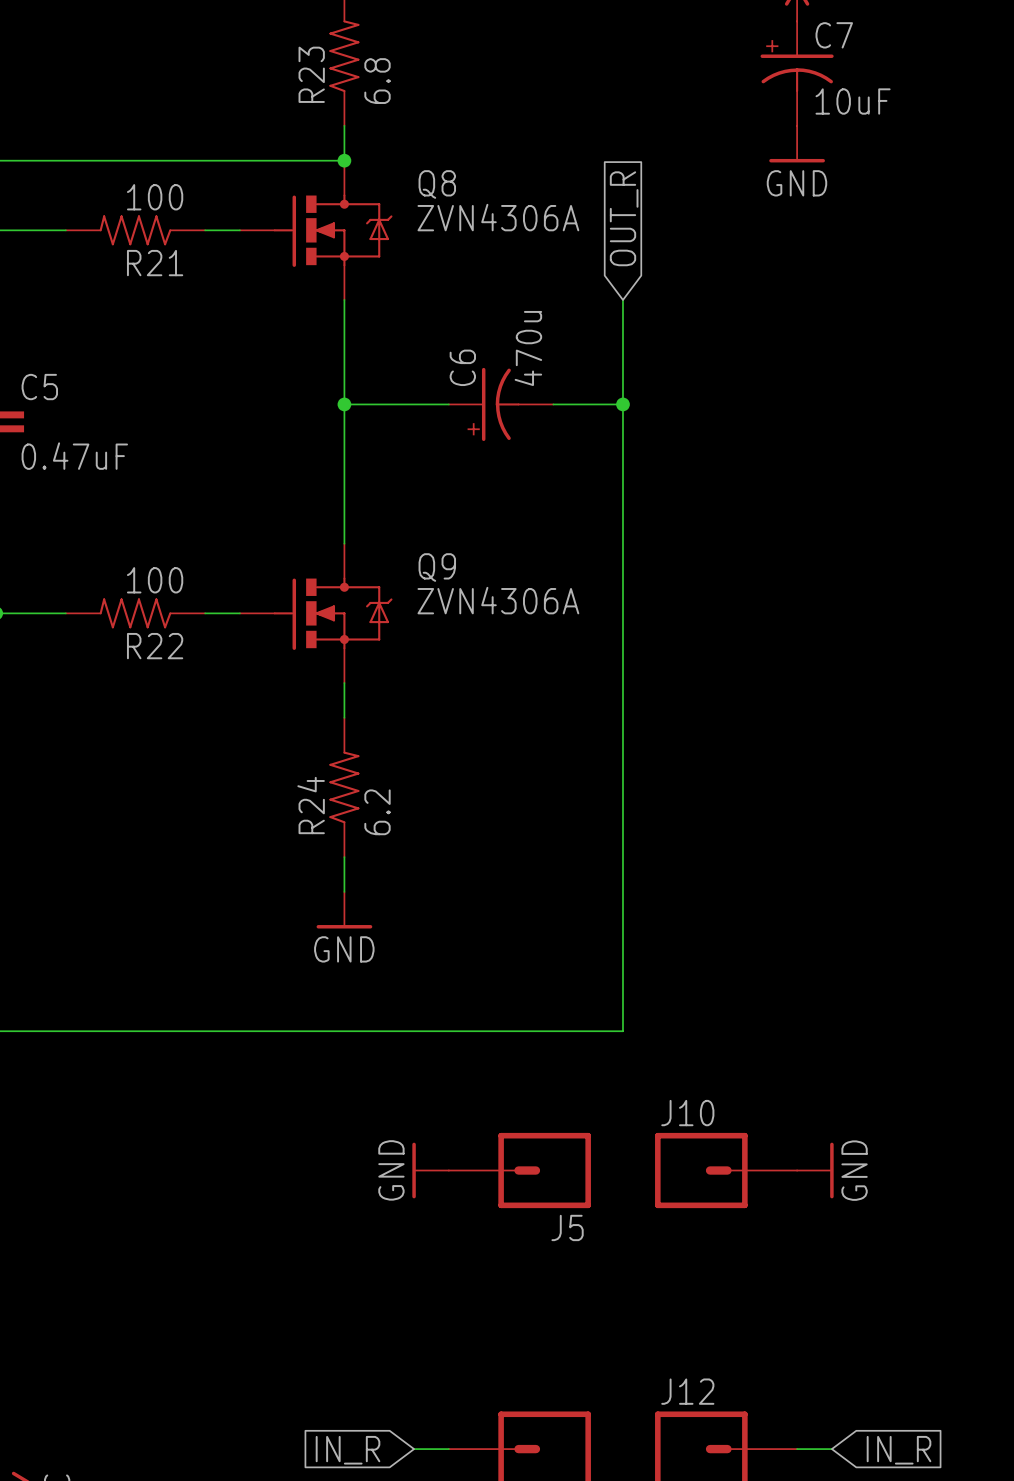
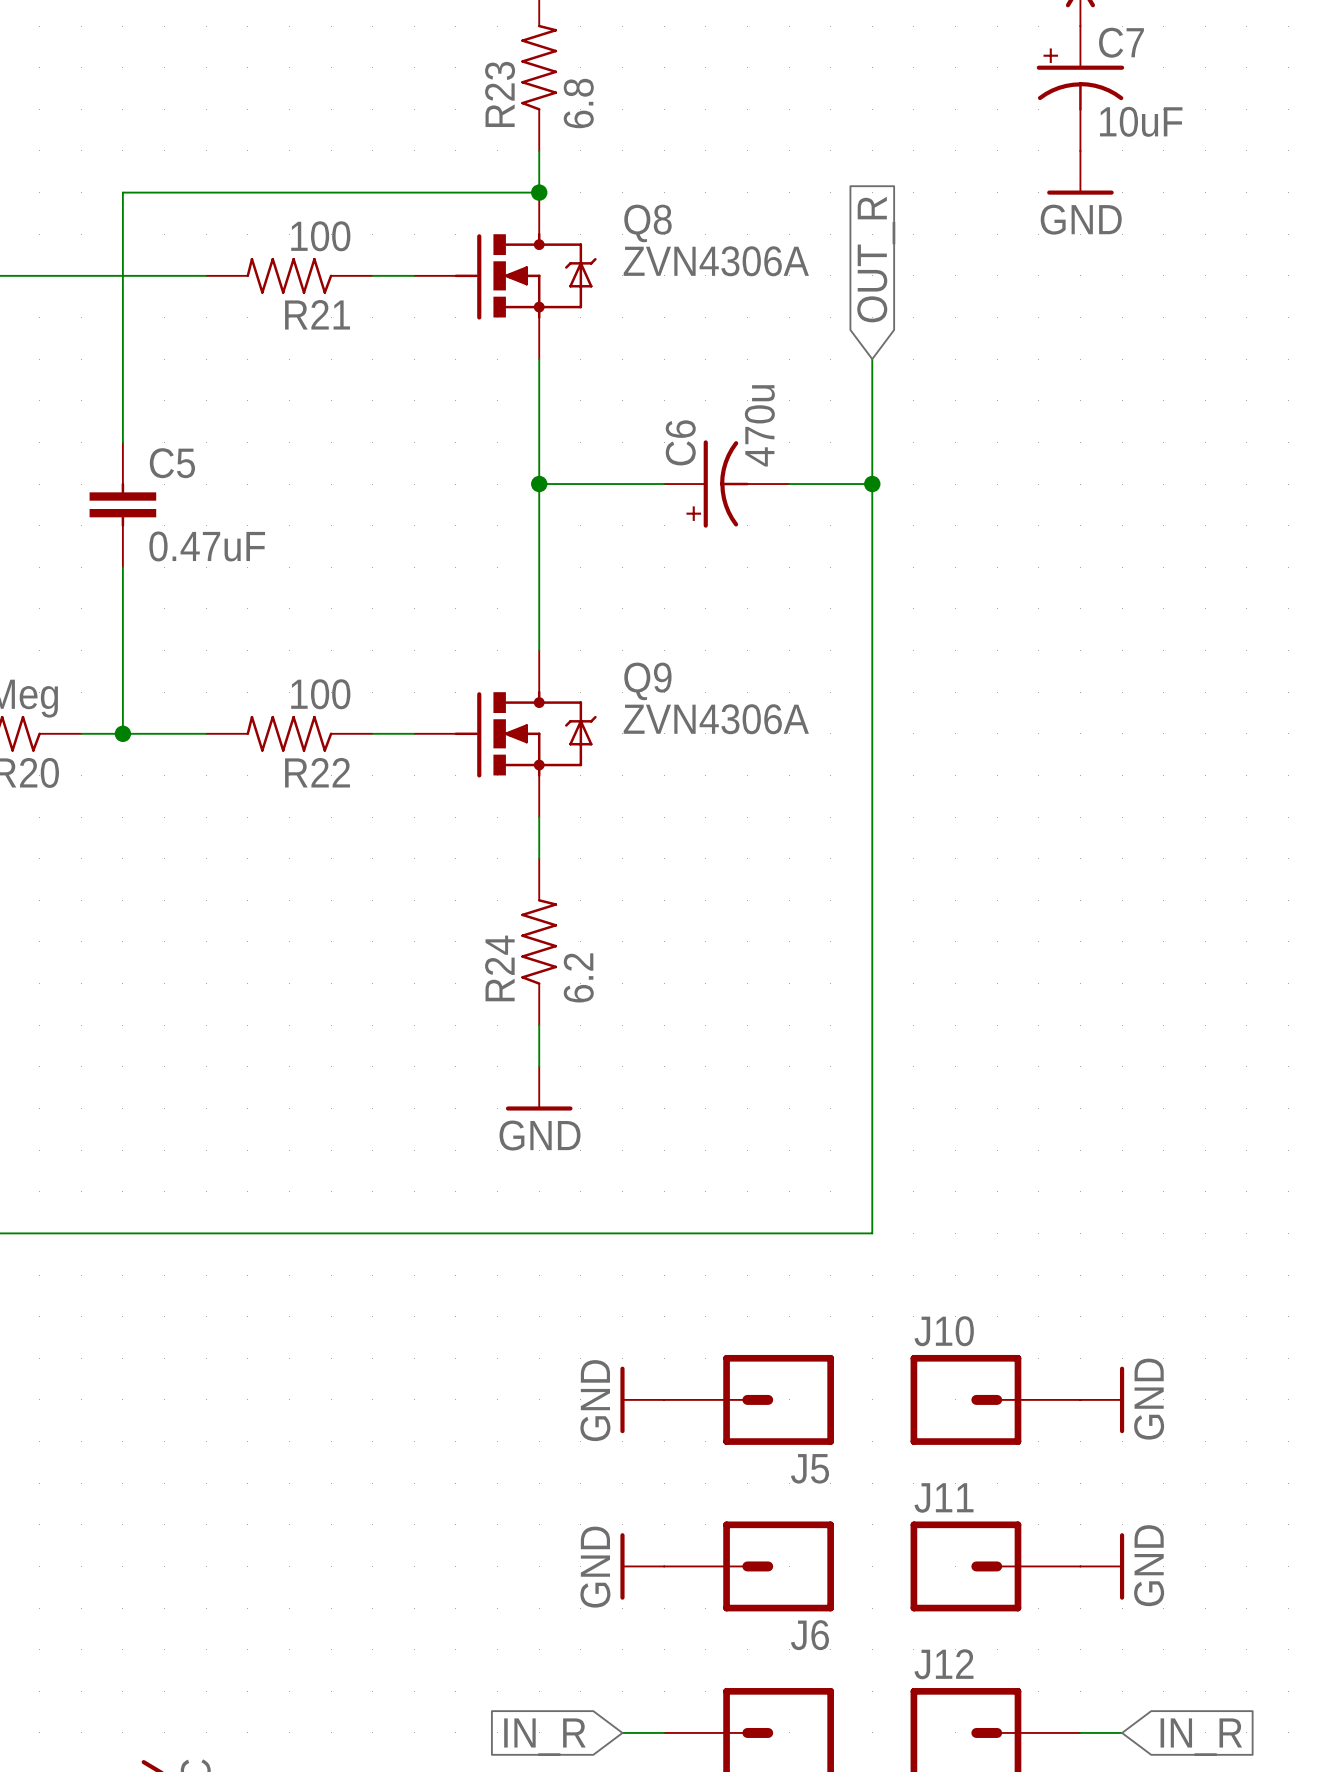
power symbol: none -> GND (642, 1566)
J6: none -> (749, 1566)
J11: none -> (995, 1566)
power symbol: none -> GND (1102, 1566)

